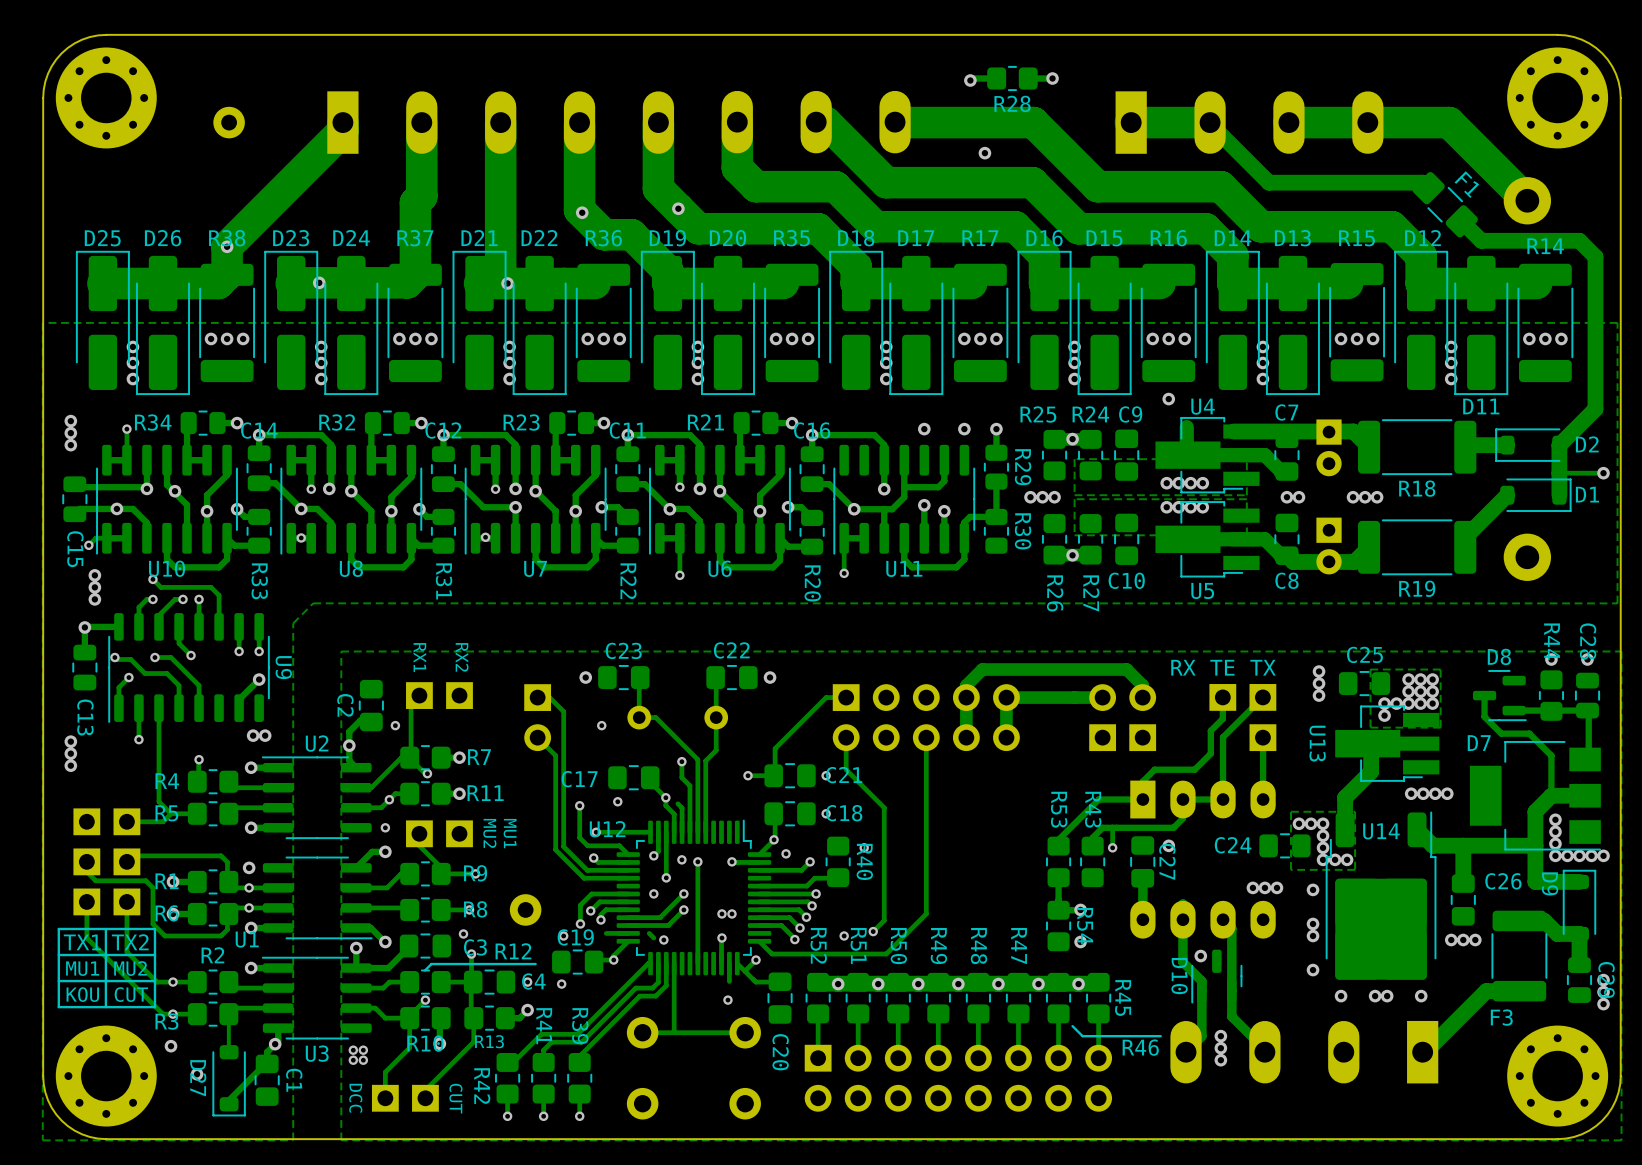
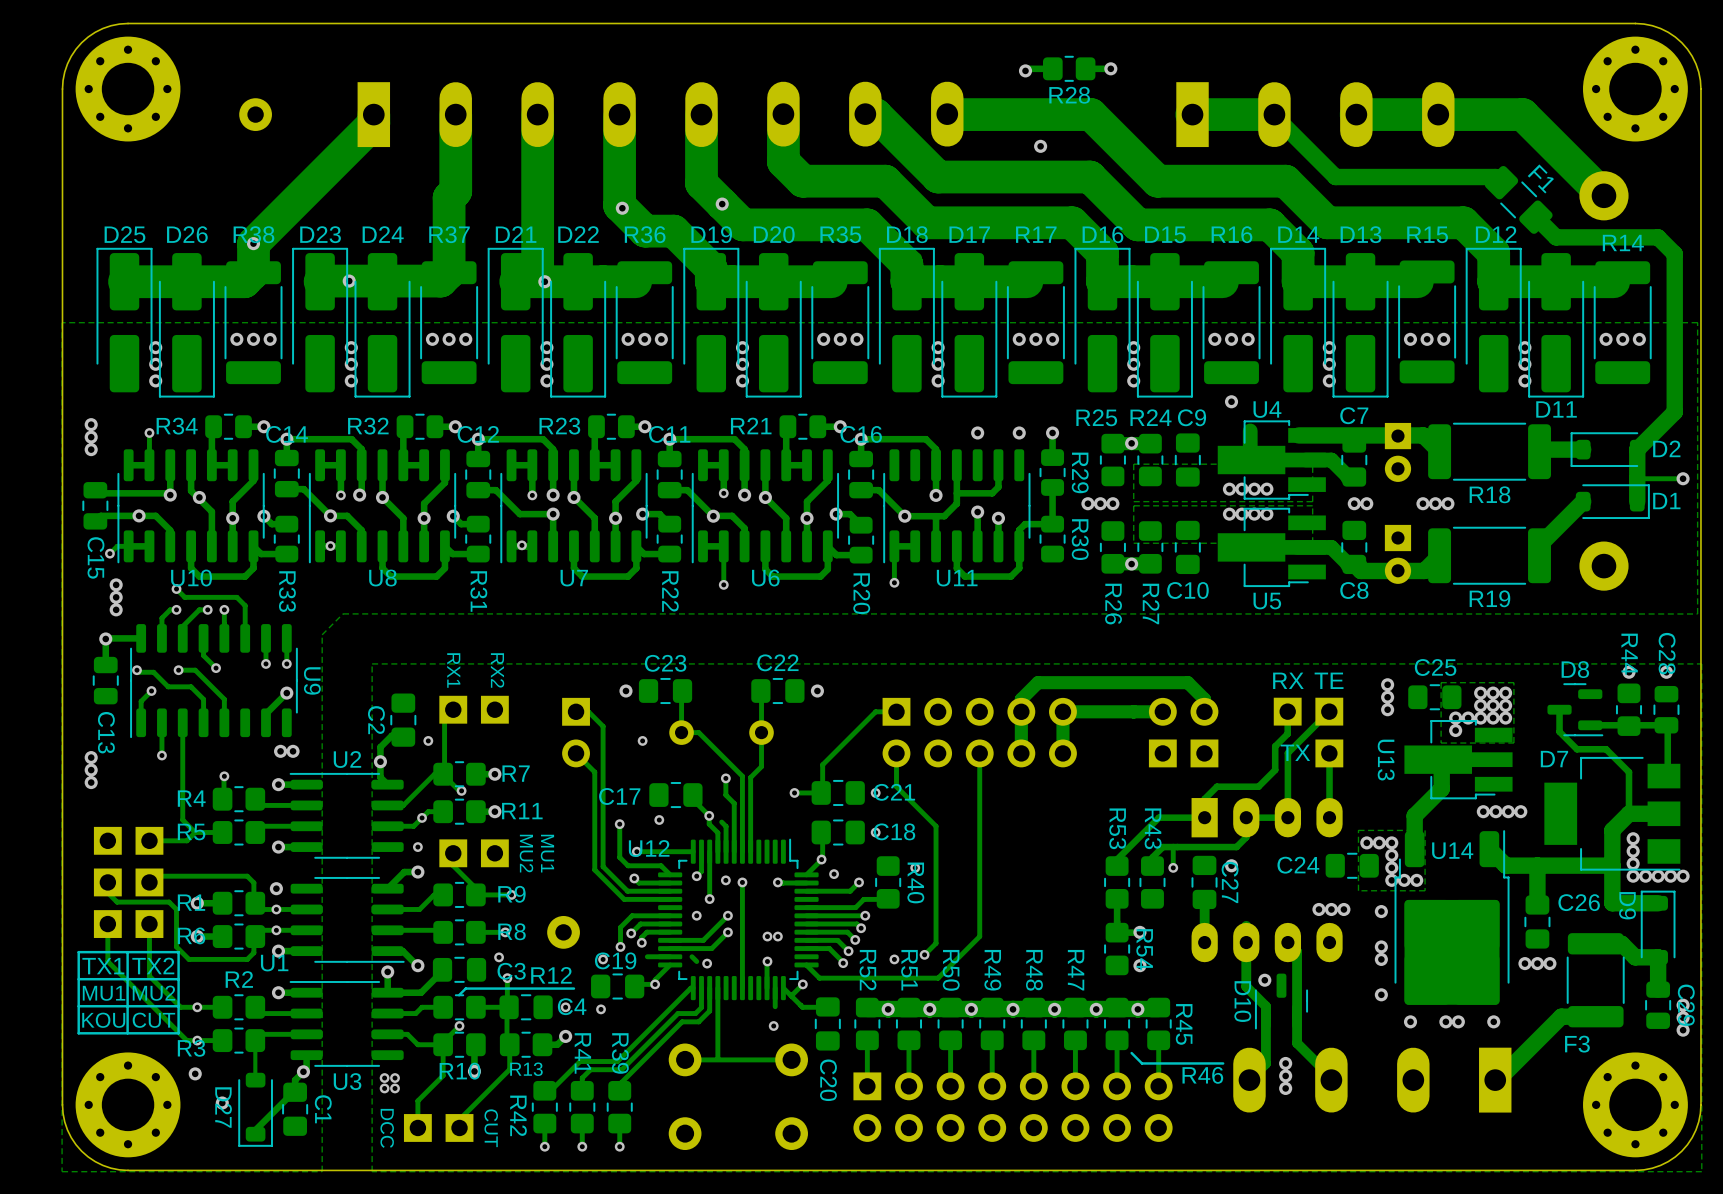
text: RX (1183, 667) -> none
text: TE (1222, 667) -> RX (1288, 680)
text: TX (1263, 667) -> TE (1329, 680)
text: none -> TX (1295, 752)

